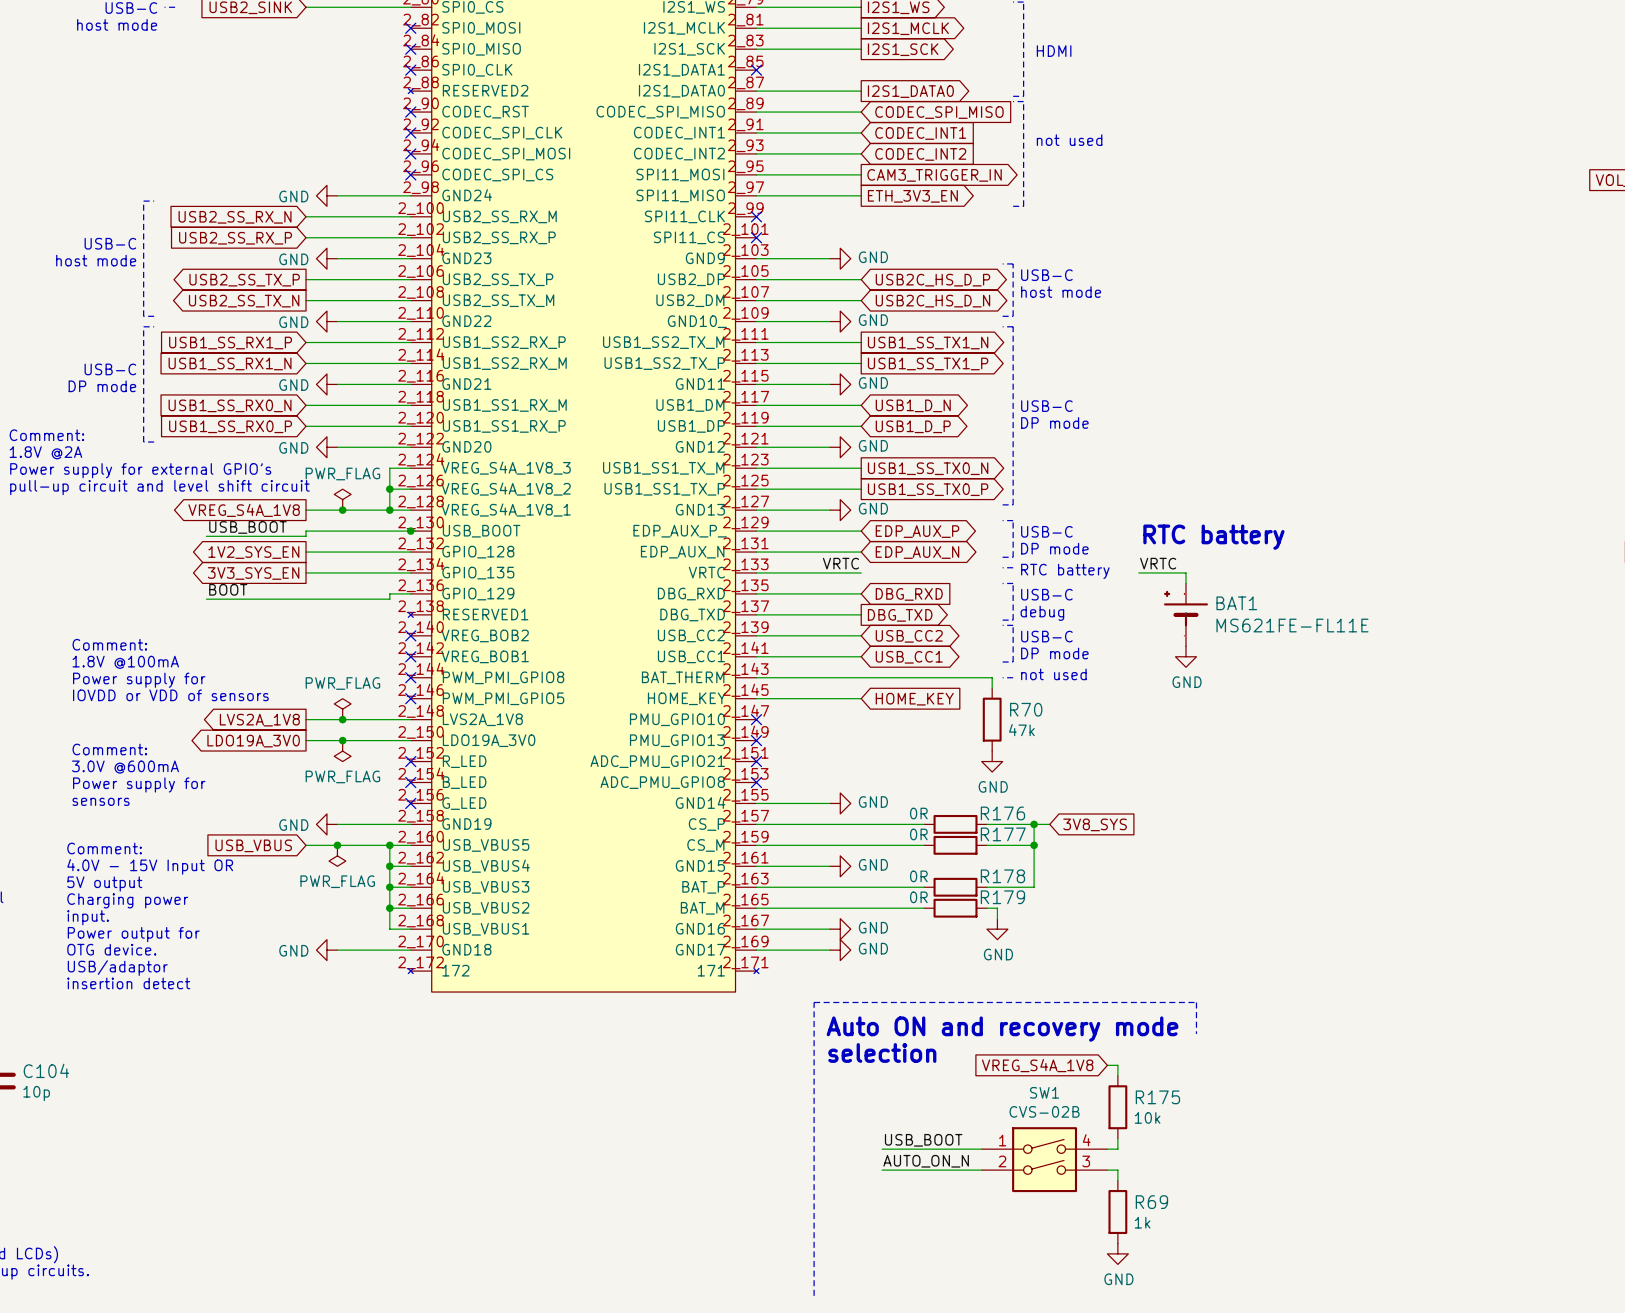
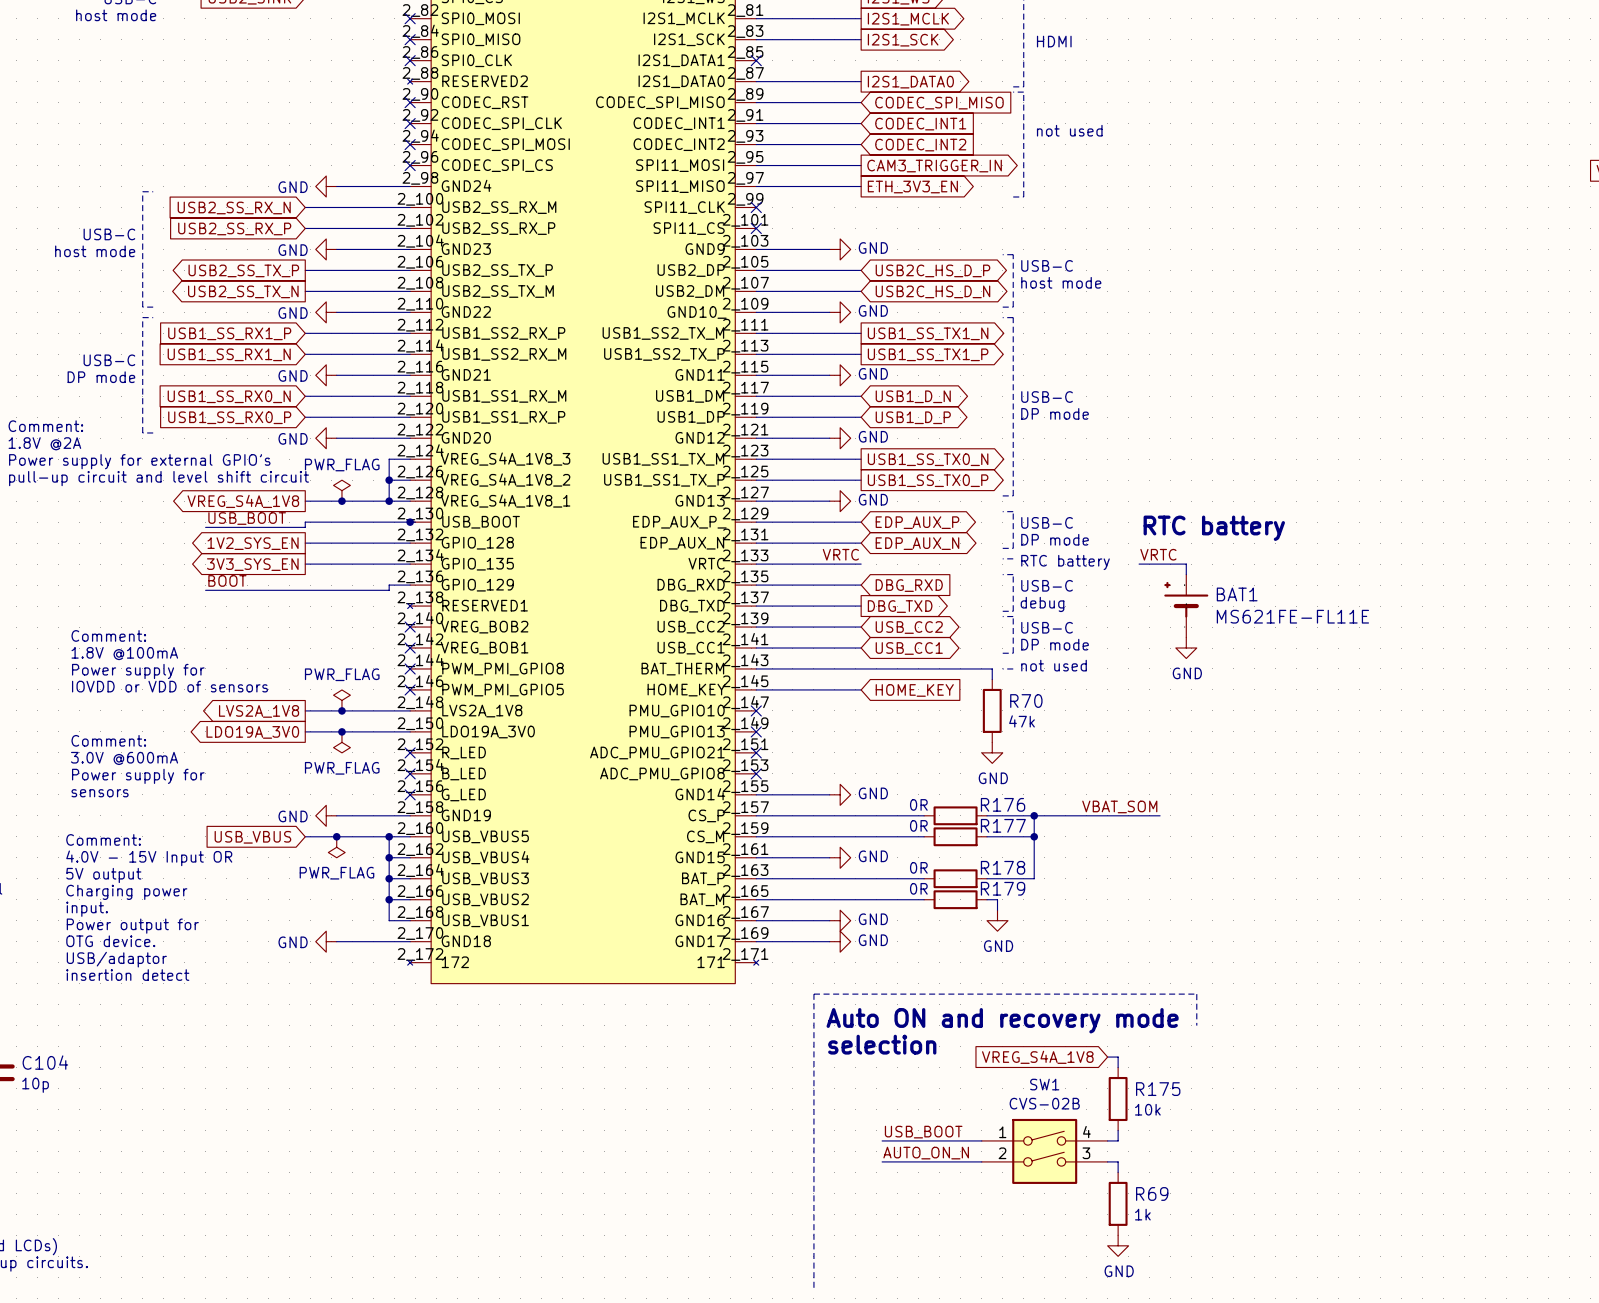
label: none -> VBAT_SOM (1119, 806)
wire: none -> (1049, 815) (1160, 815)
global label: 3V8_SYS (1095, 824) -> none

